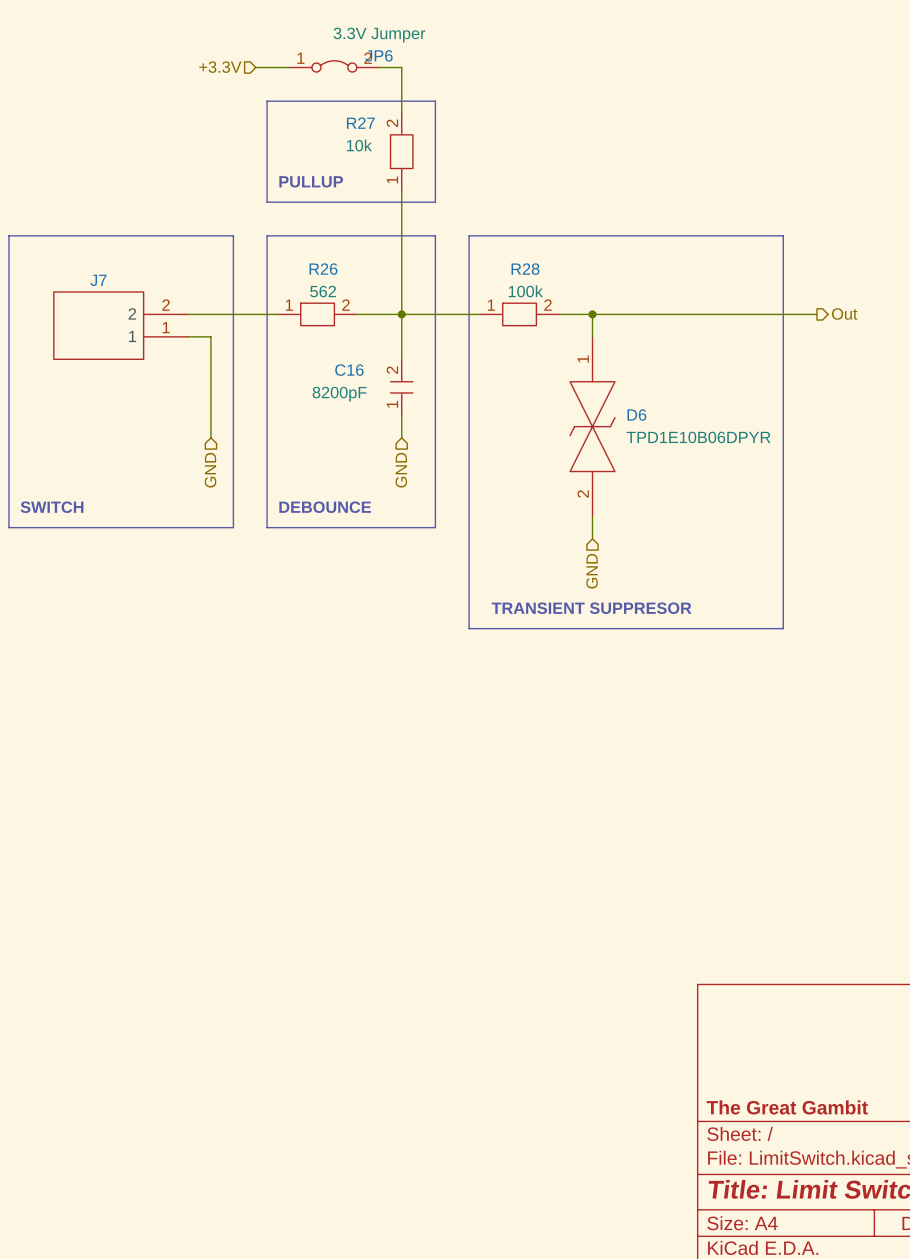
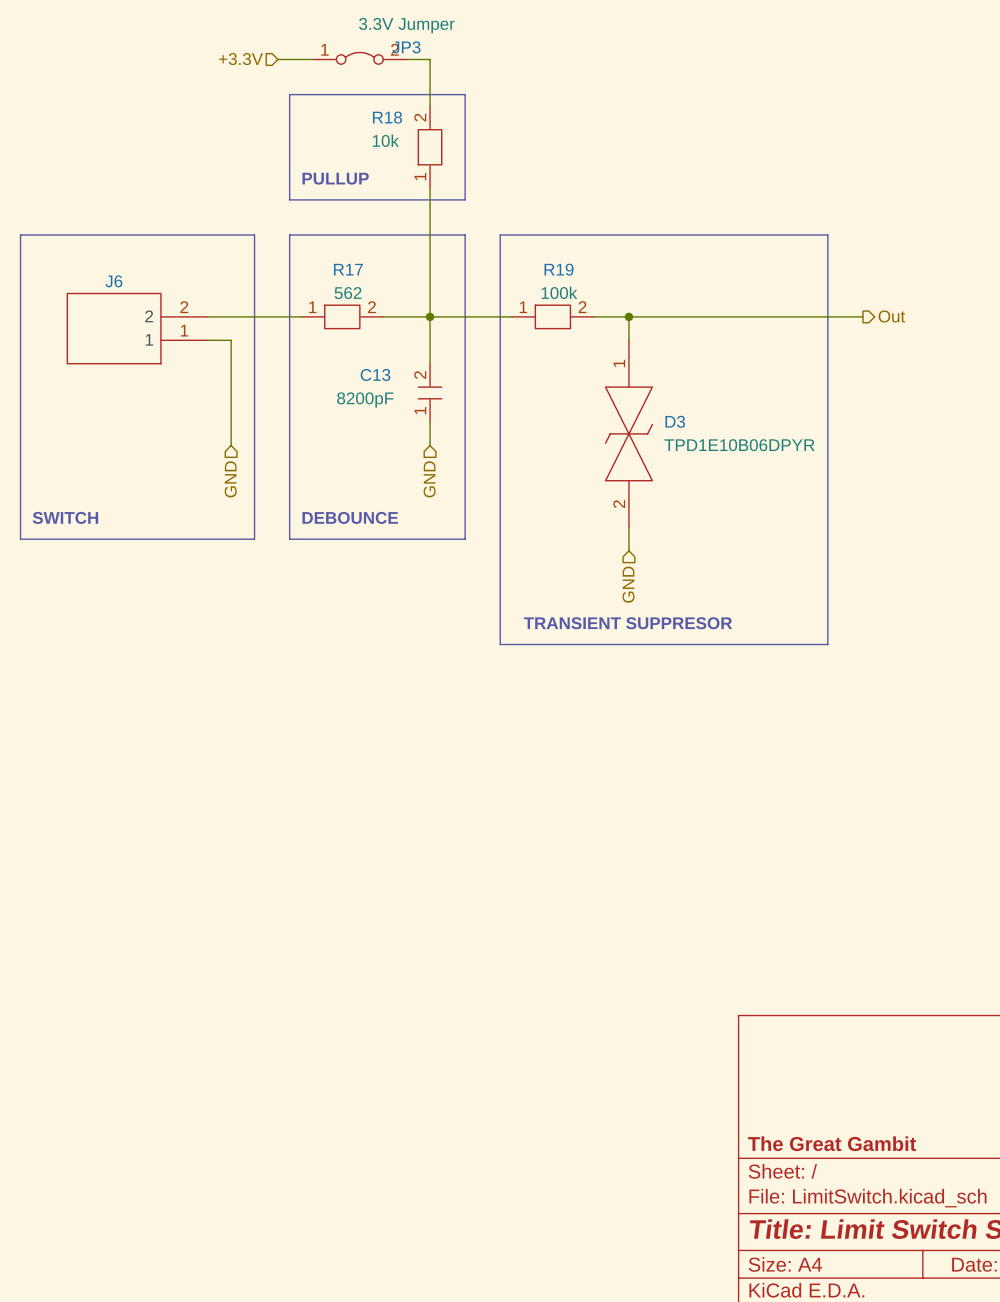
JP6 name: JP6 (379, 55) -> JP3 (406, 47)
R27 name: R27 (360, 123) -> R18 (387, 117)
R26 name: R26 (323, 269) -> R17 (348, 269)
R28 name: R28 (525, 269) -> R19 (559, 269)
J7 name: J7 (98, 280) -> J6 (113, 281)
C16 name: C16 (349, 370) -> C13 (375, 374)
D6 name: D6 (636, 414) -> D3 (675, 421)

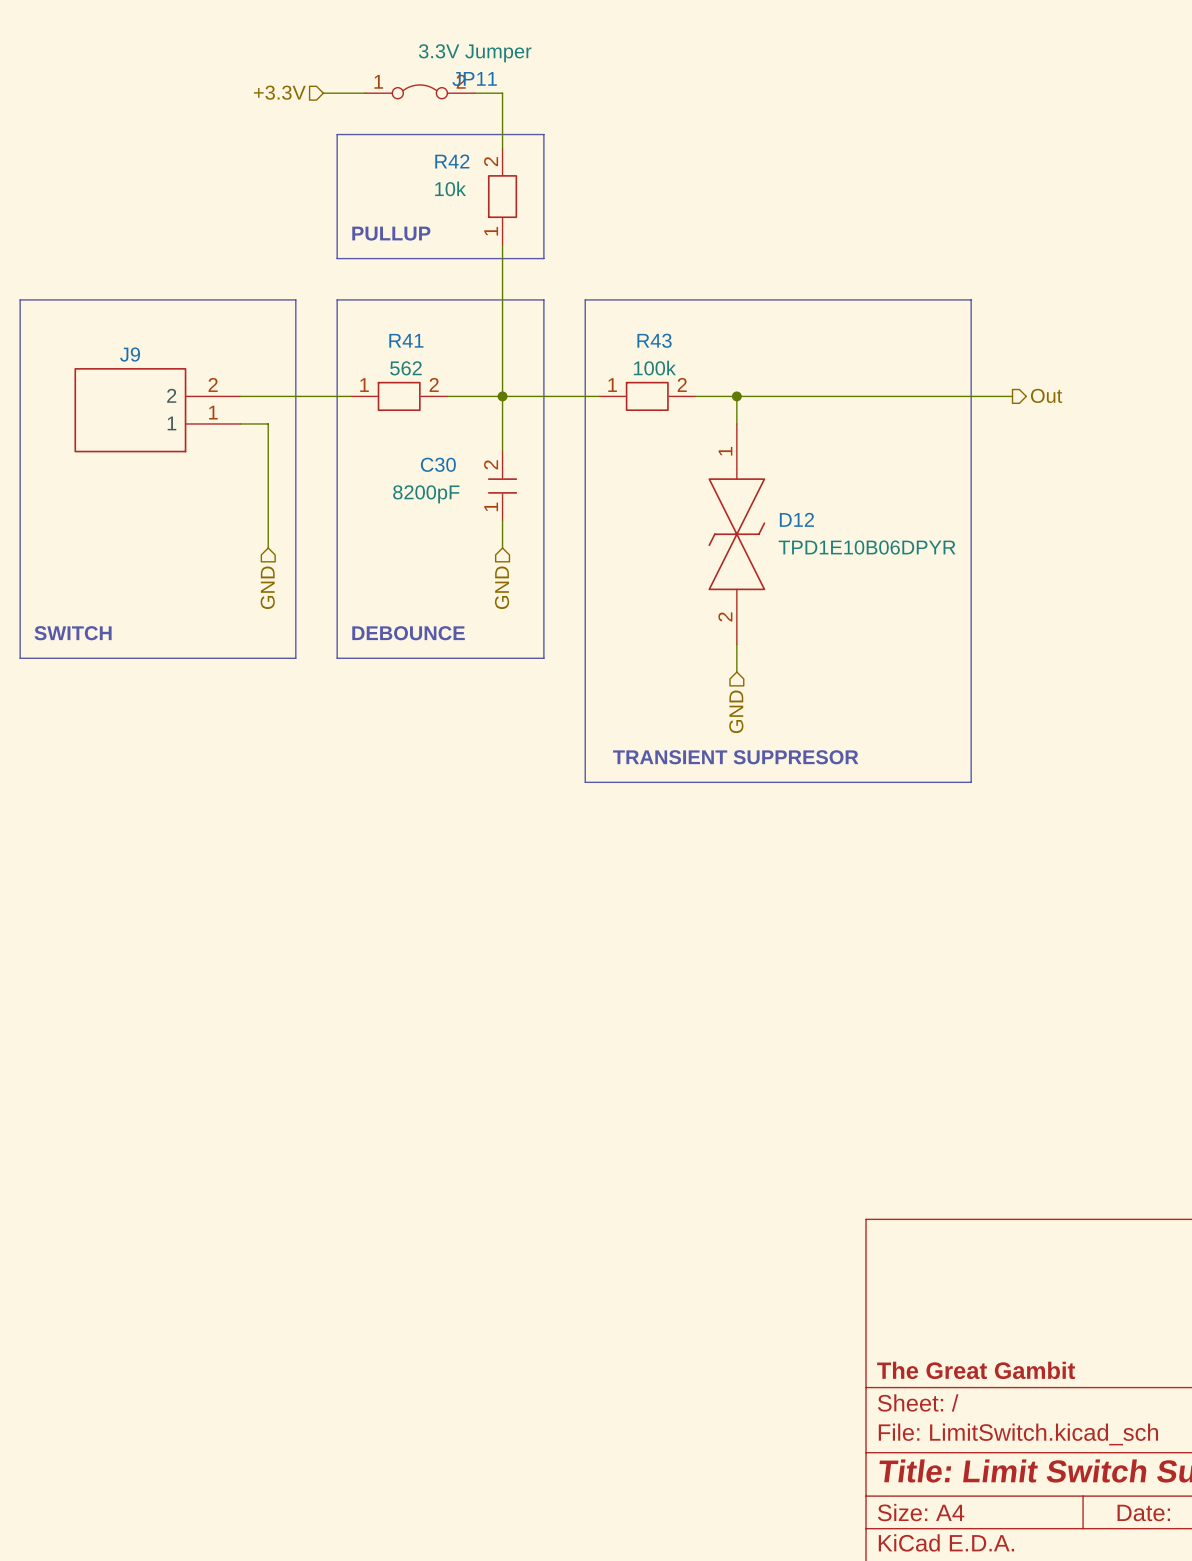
JP3 name: JP3 (406, 47) -> JP11 (474, 79)
R18 name: R18 (387, 117) -> R42 (452, 161)
R17 name: R17 (348, 269) -> R41 (406, 340)
R19 name: R19 (559, 269) -> R43 (654, 340)
J6 name: J6 (113, 281) -> J9 (130, 354)
C13 name: C13 (375, 374) -> C30 (438, 464)
D3 name: D3 (675, 421) -> D12 (796, 519)

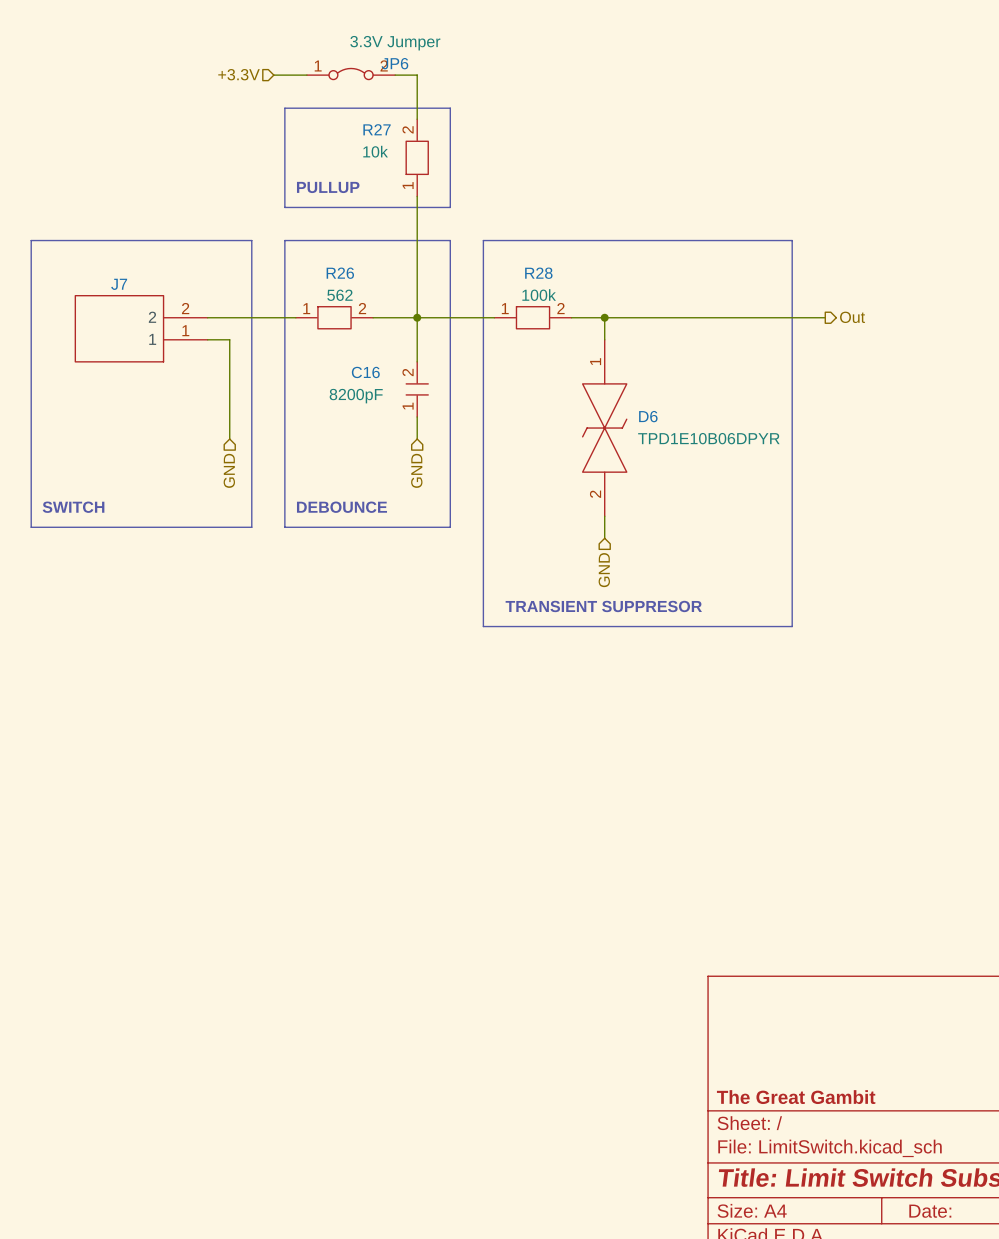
JP11 name: JP11 (474, 79) -> JP6 (394, 63)
R42 name: R42 (452, 161) -> R27 (377, 129)
R41 name: R41 (406, 340) -> R26 (340, 273)
R43 name: R43 (654, 340) -> R28 (538, 273)
J9 name: J9 (130, 354) -> J7 (119, 284)
C30 name: C30 (438, 464) -> C16 (365, 372)
D12 name: D12 (796, 519) -> D6 (648, 416)

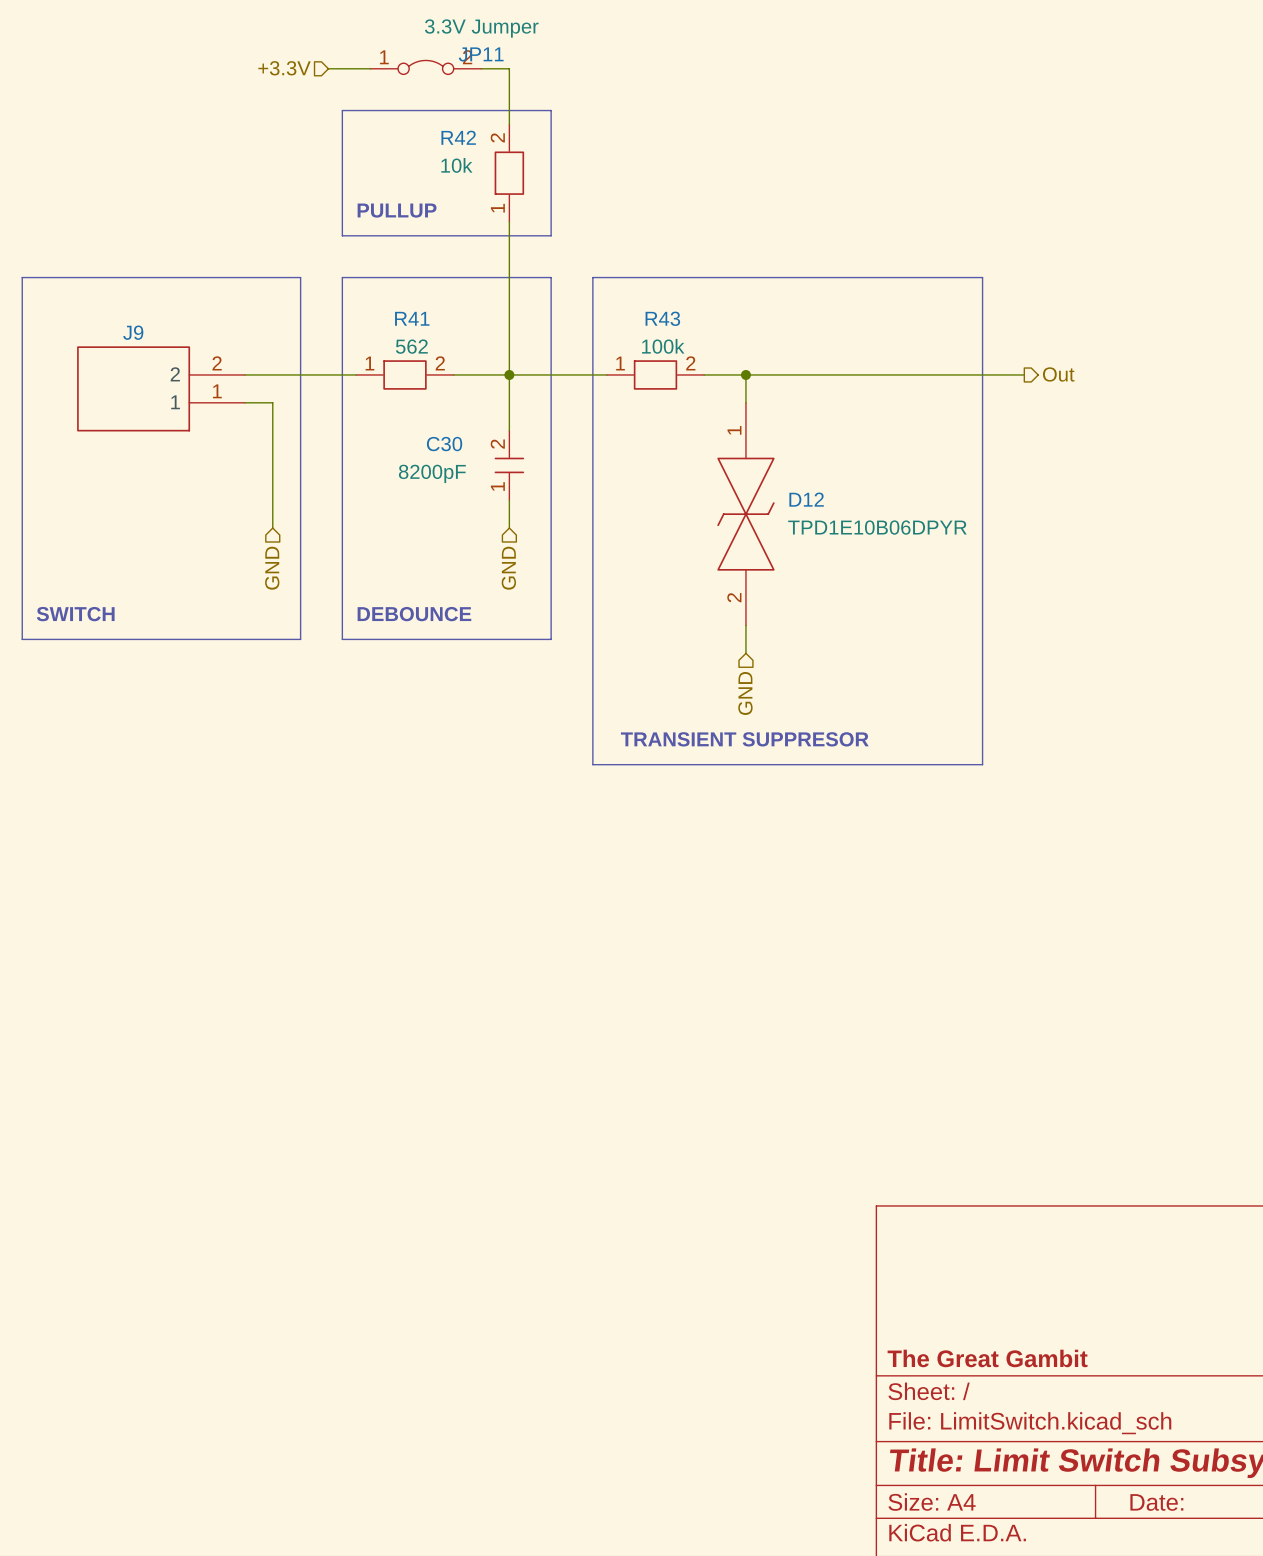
JP6 name: JP6 (394, 63) -> JP11 (481, 54)
R27 name: R27 (377, 129) -> R42 (458, 137)
R26 name: R26 (340, 273) -> R41 (412, 318)
R28 name: R28 (538, 273) -> R43 (662, 318)
J7 name: J7 (119, 284) -> J9 (133, 332)
C16 name: C16 (365, 372) -> C30 (444, 444)
D6 name: D6 (648, 416) -> D12 (806, 499)

